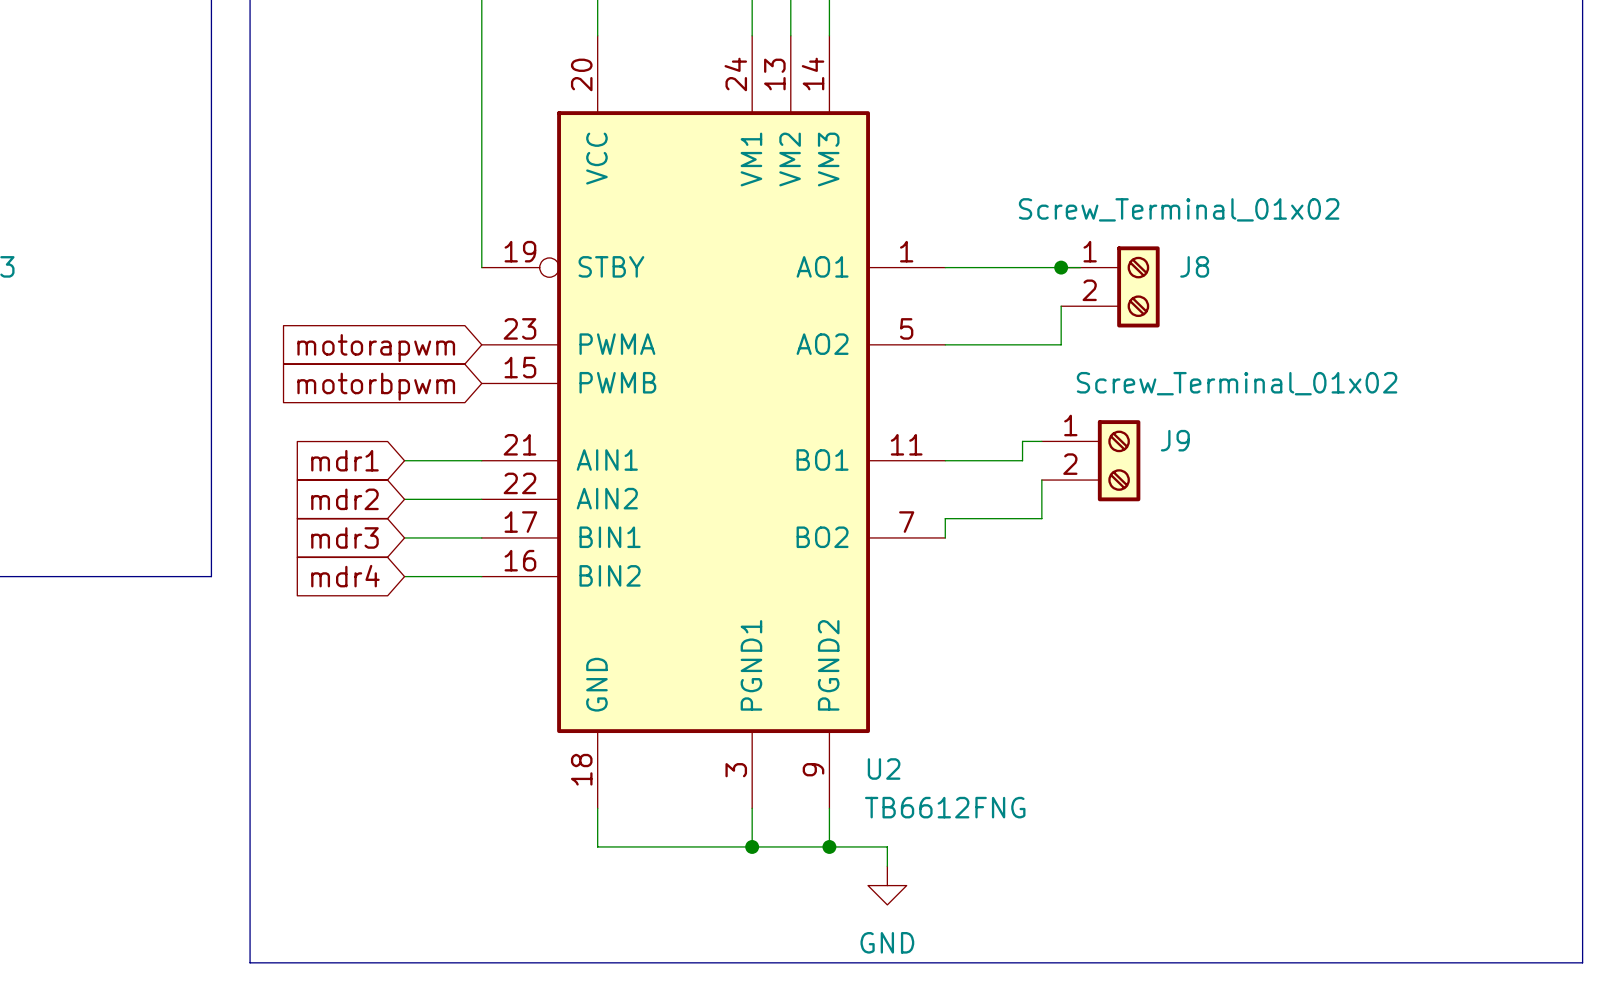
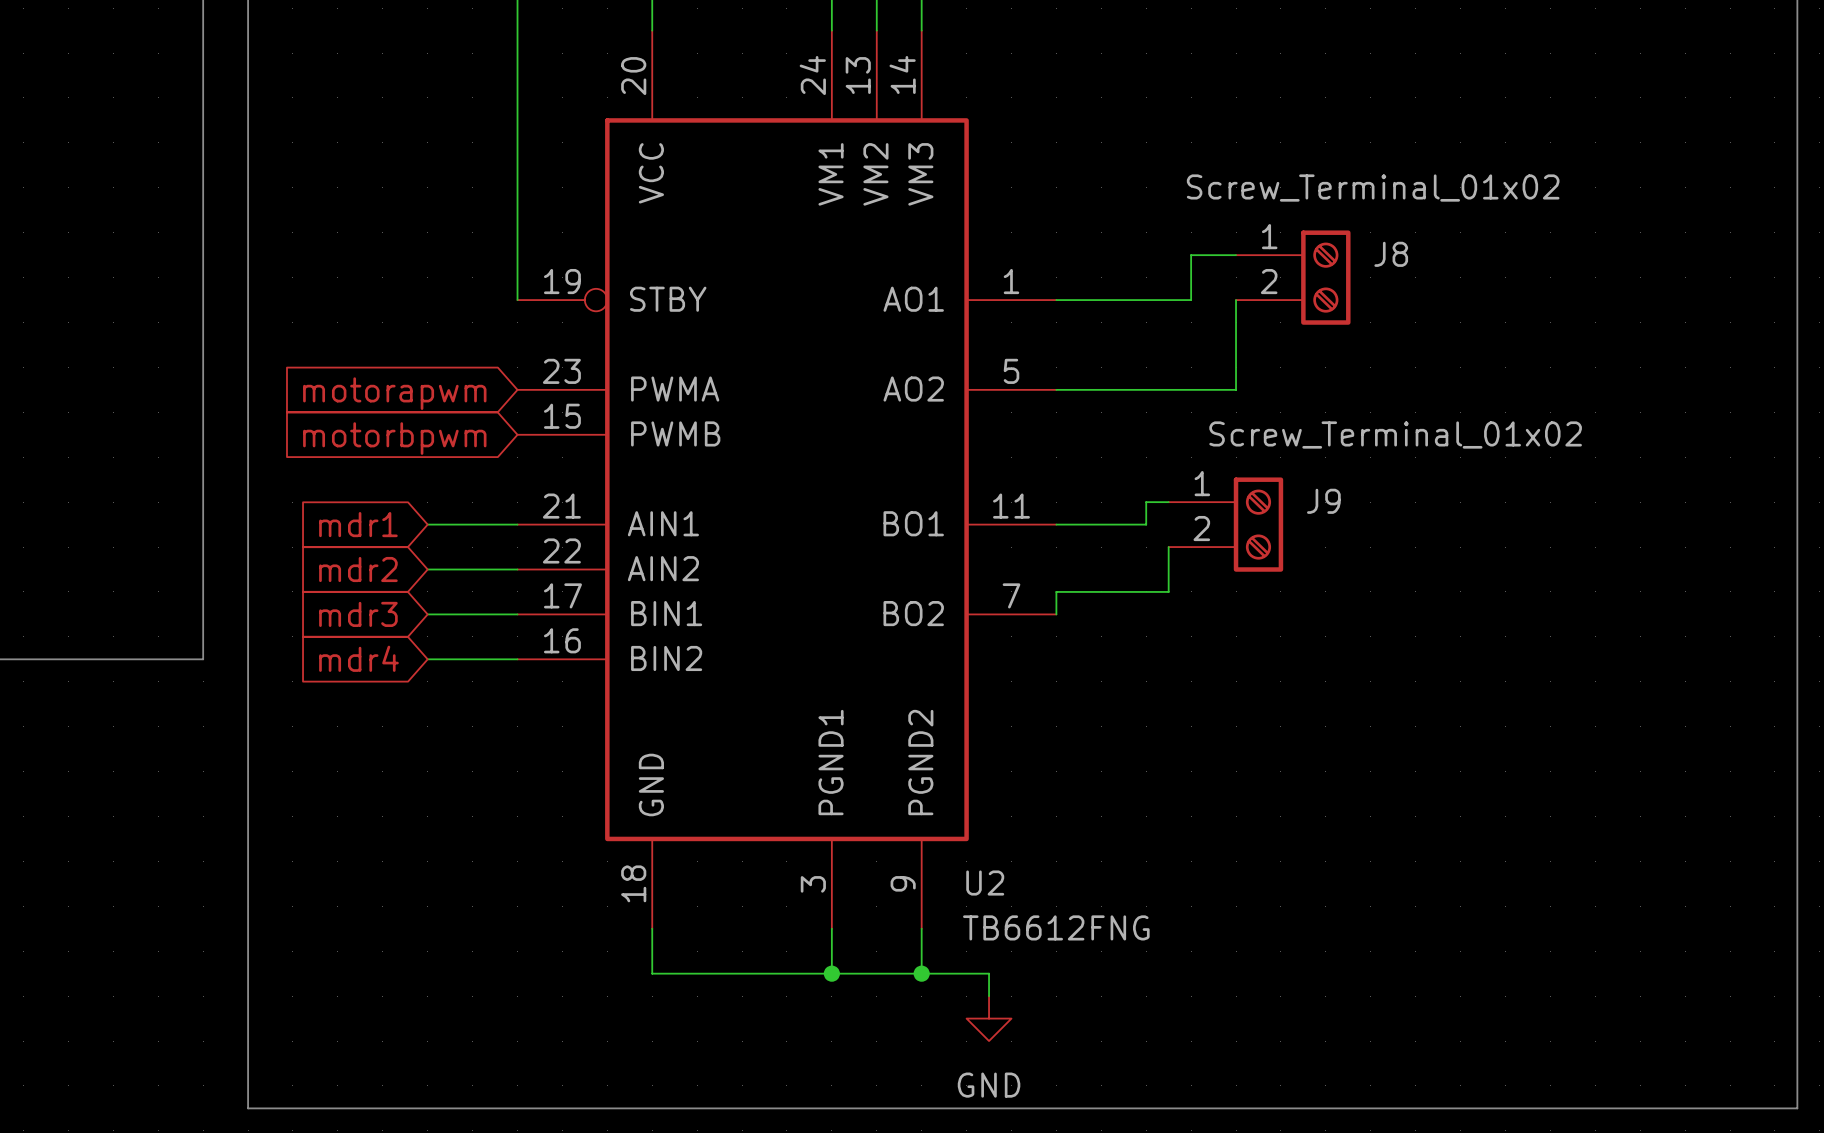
wire: (1061, 267) (1080, 267) -> (1191, 300) (1191, 255) (1236, 255)
junction: (1061, 267) -> none
J8 position: (1110, 286) -> (1293, 277)
wire: (1061, 306) (1061, 344) -> (1236, 300) (1236, 389) (1191, 389)

